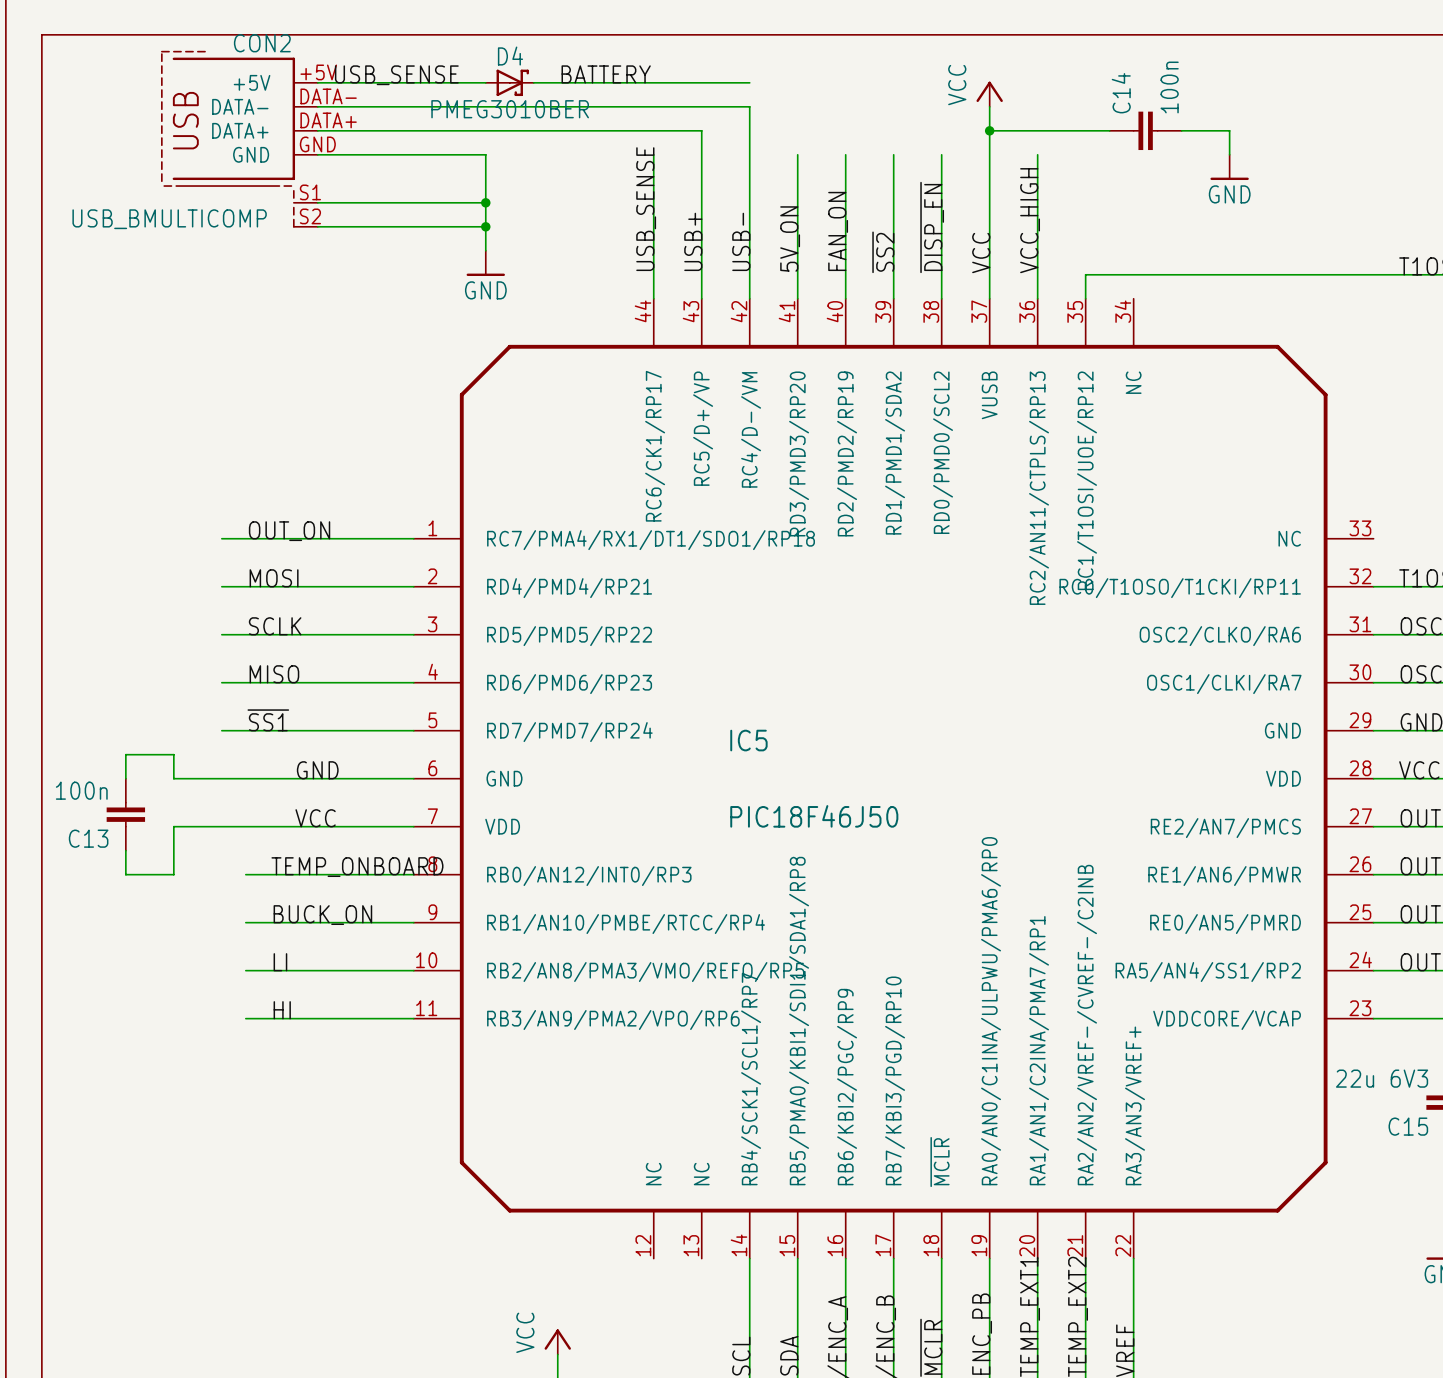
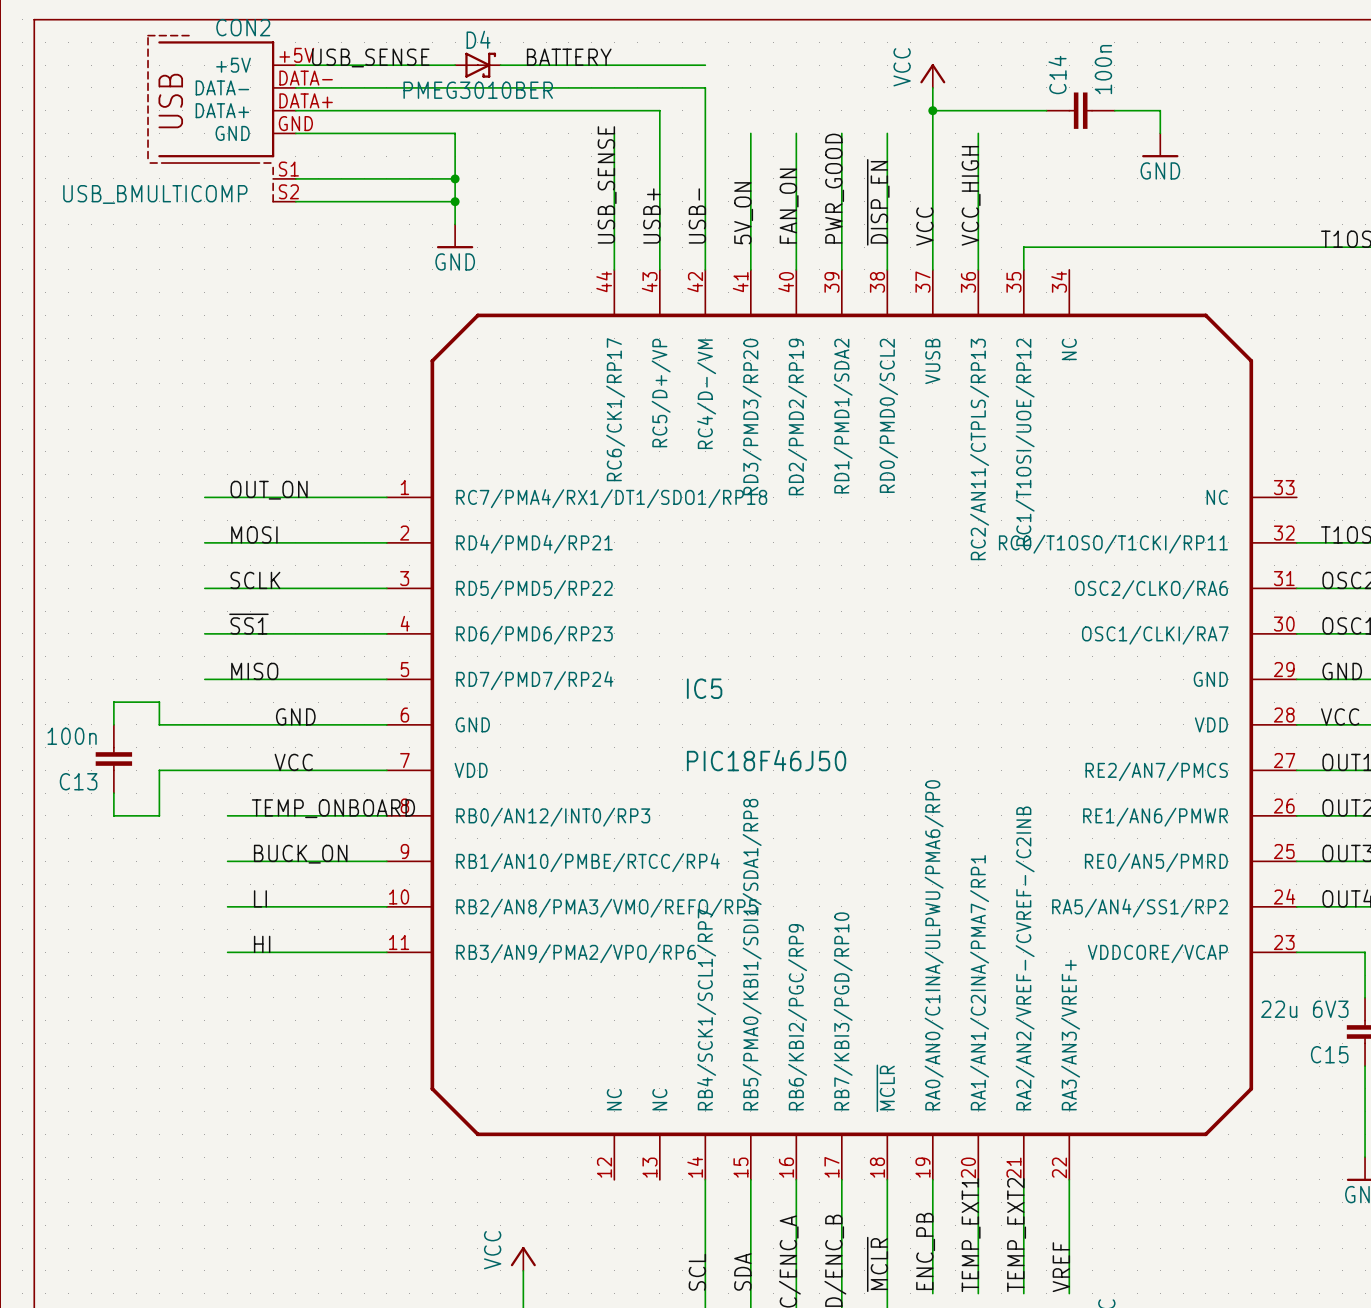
label: ~{SS2} (883, 252) -> PWR_GOOD (834, 188)
label: MISO (274, 674) -> ~{SS1} (248, 624)
label: ~{SS1} (268, 720) -> MISO (254, 671)

